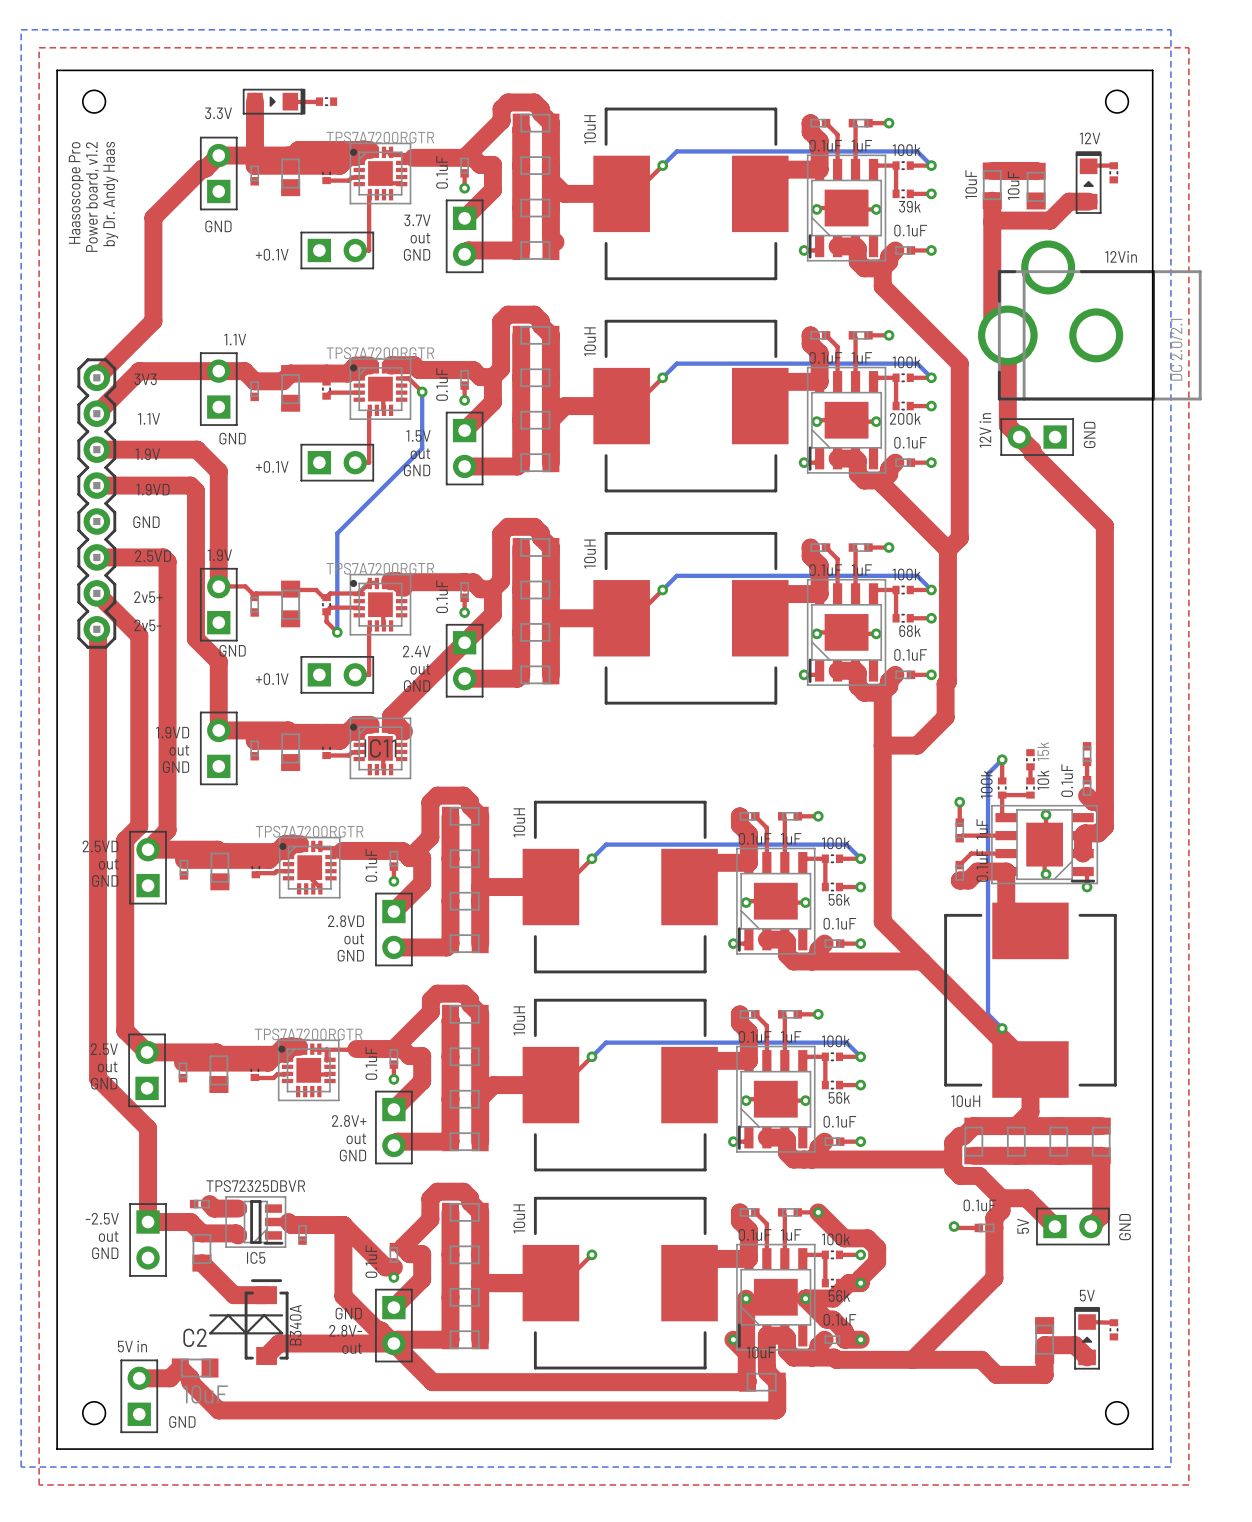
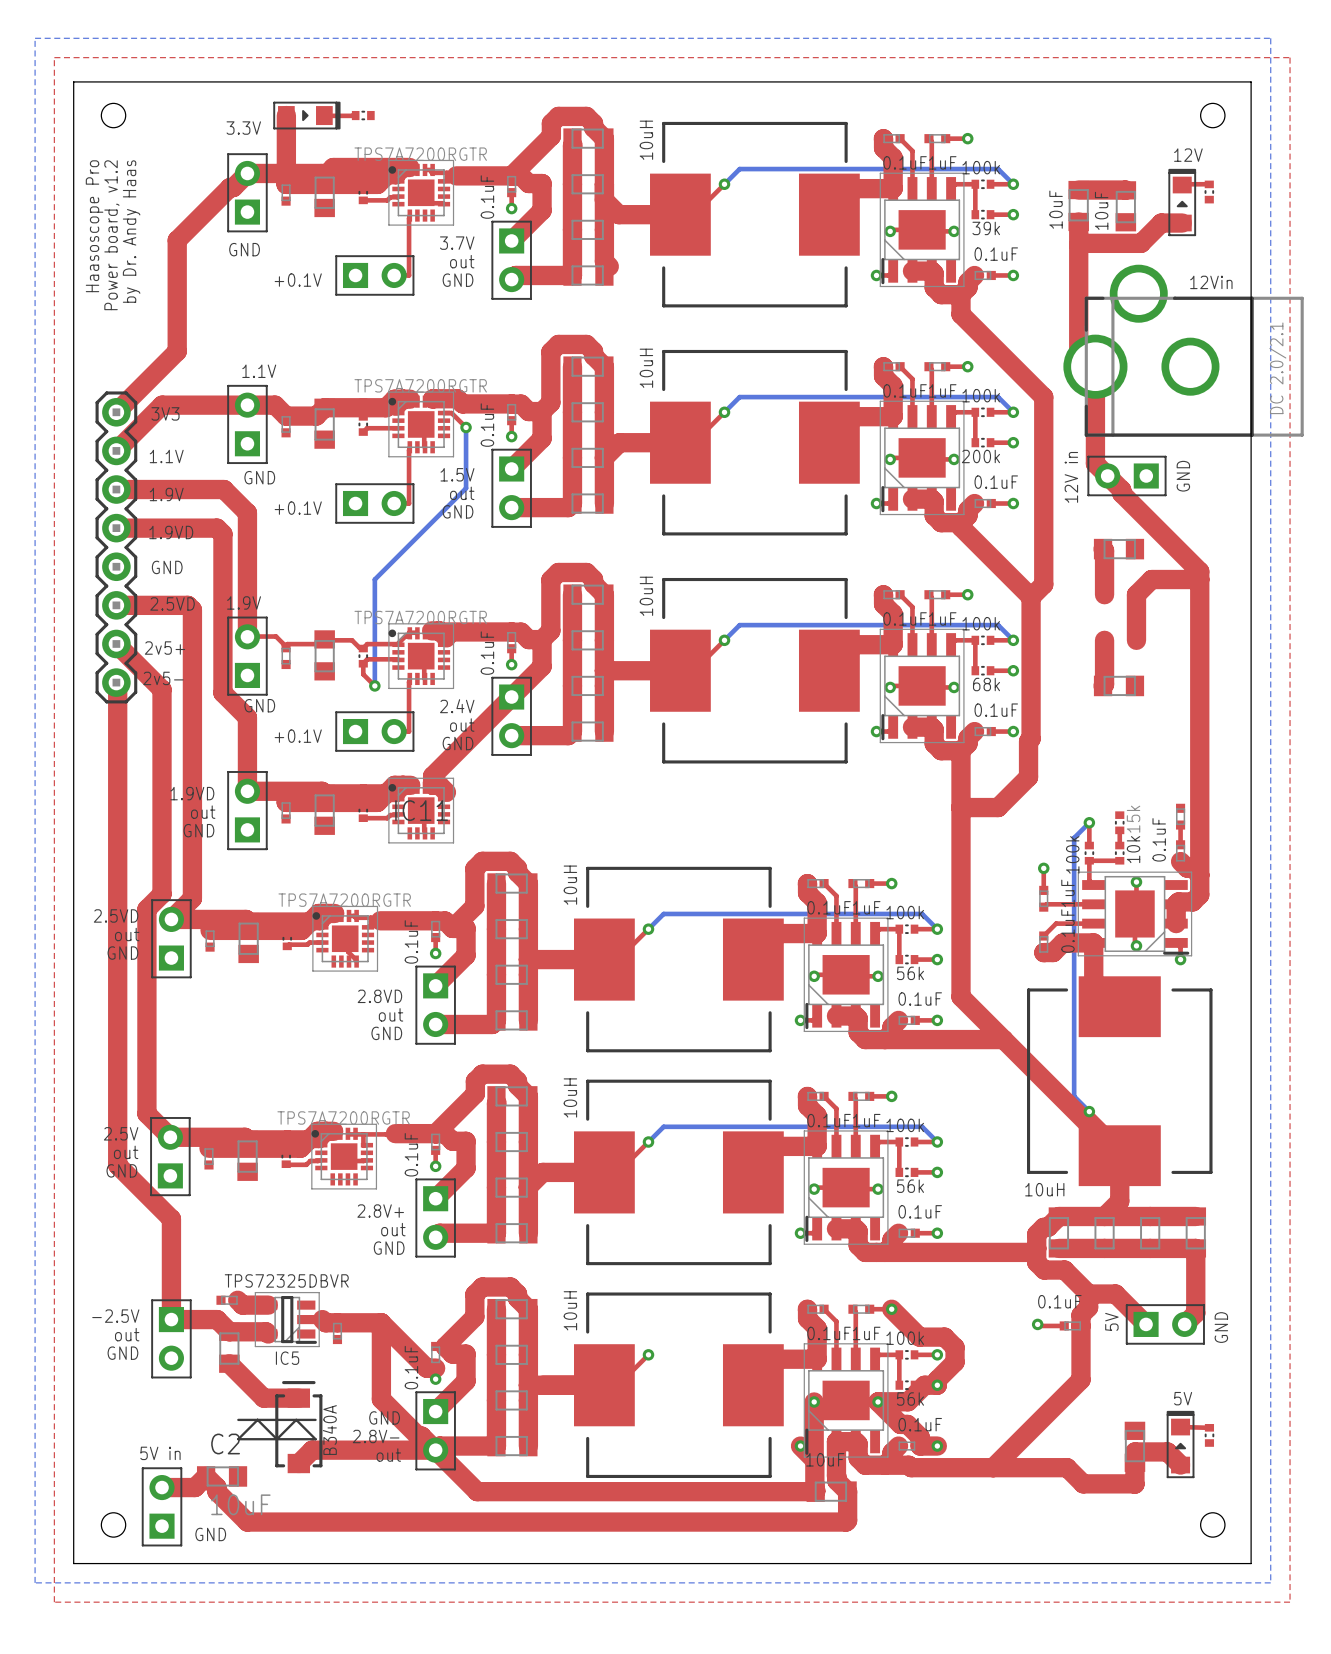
top track: none -> (1103, 549) (1104, 594)
part: none -> (1119, 549)
top track: none -> (1199, 579) (1151, 579) (1136, 594) (1136, 640)
top track: none -> (1104, 640) (1103, 685)
part: none -> (1119, 685)

